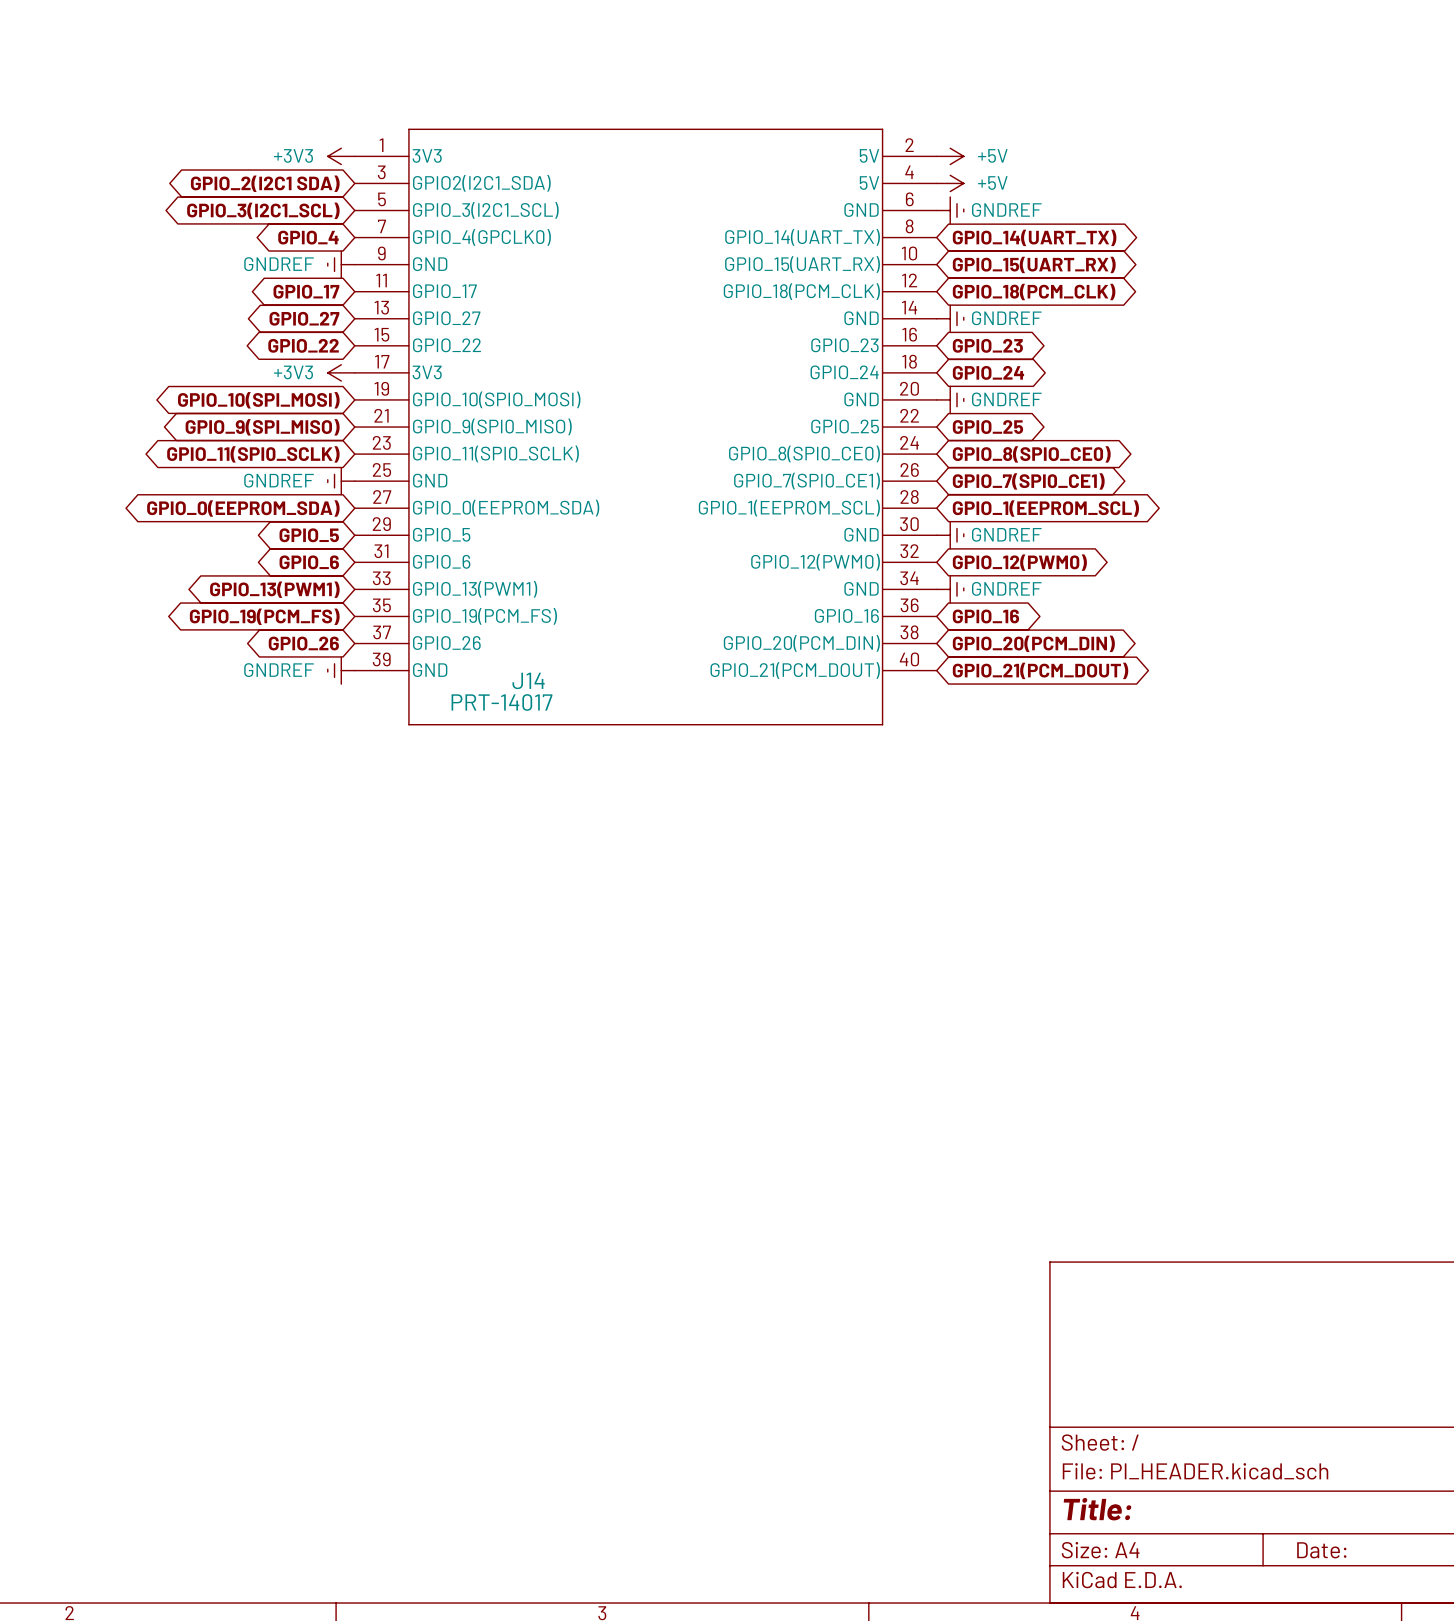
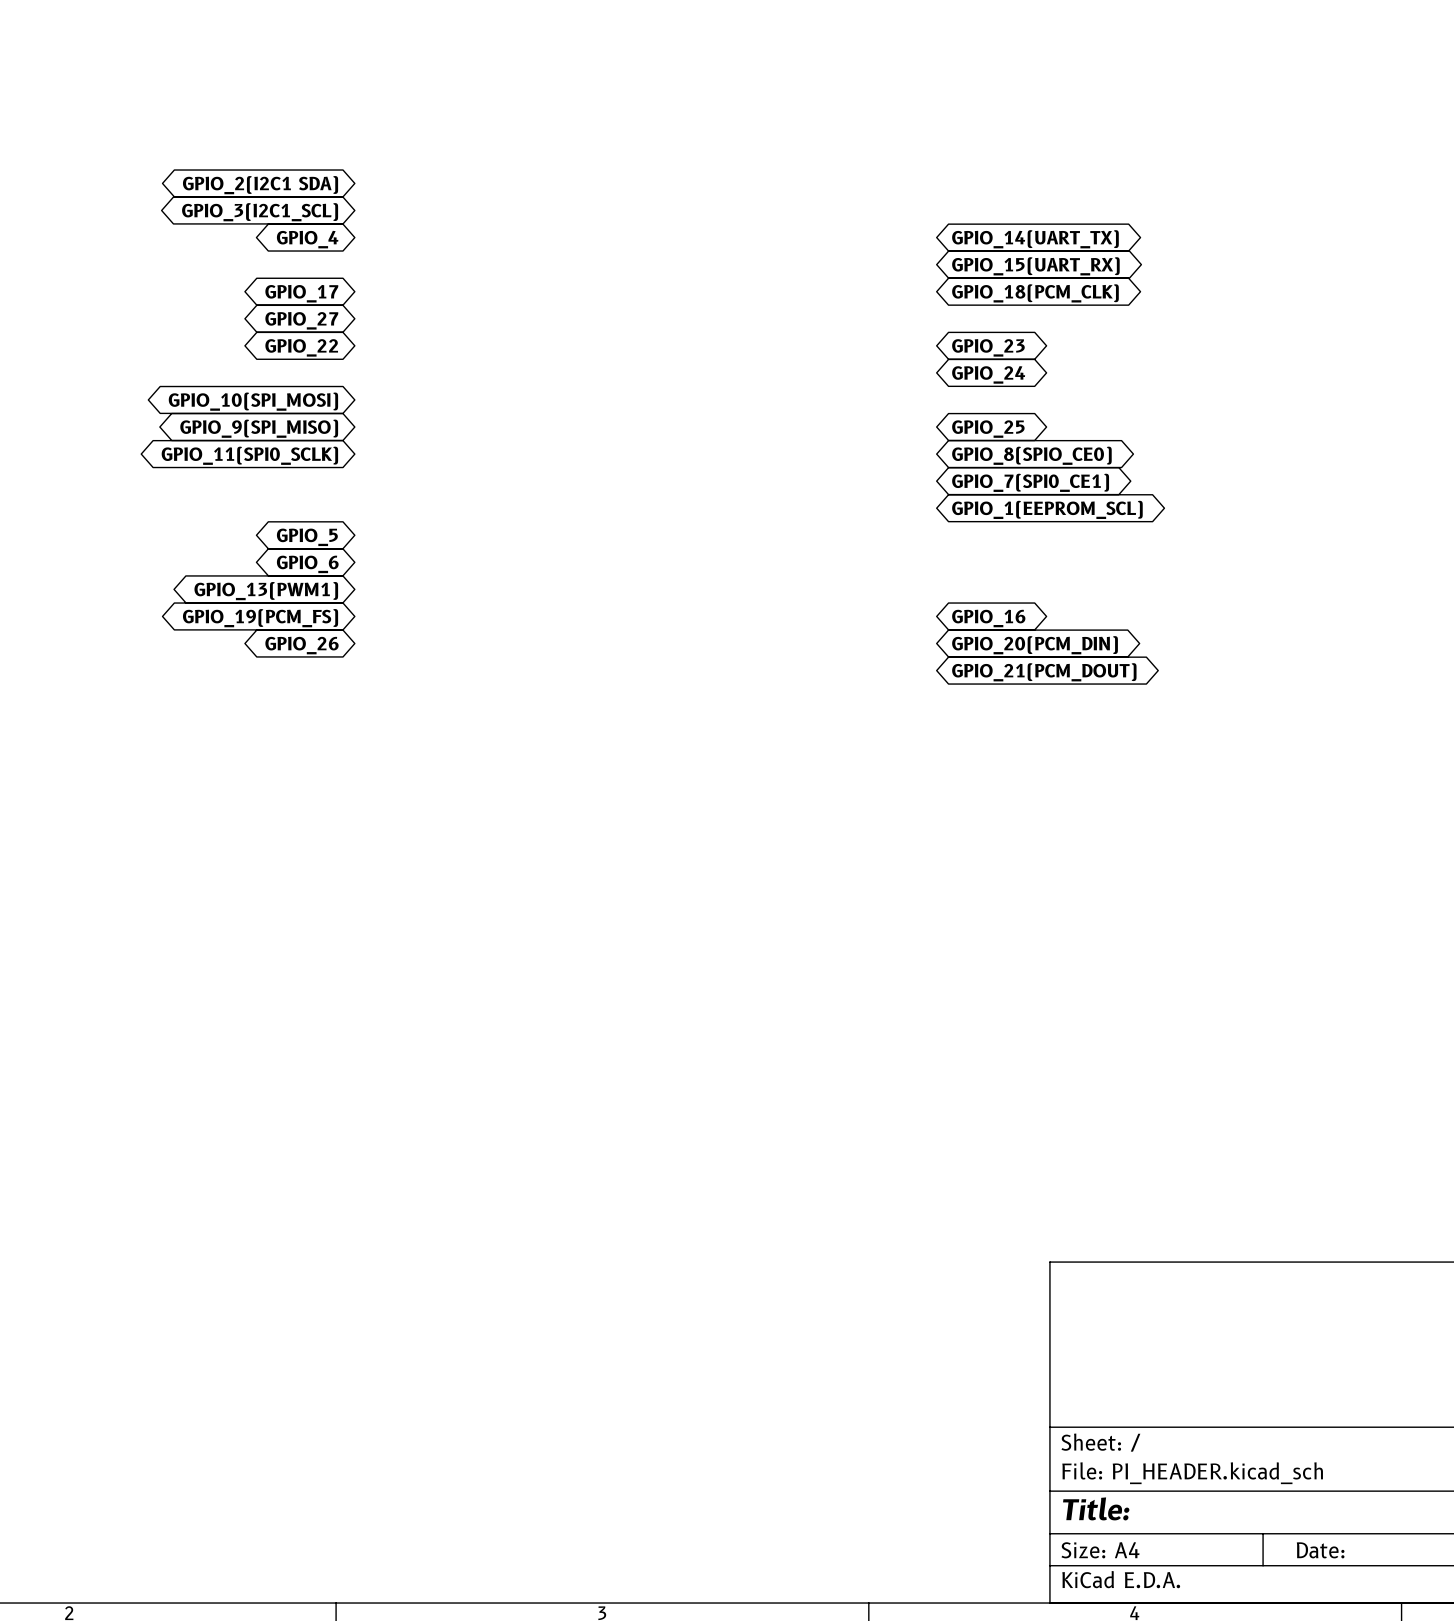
power symbol: +3V3 (341, 156) -> none
power symbol: +5V (950, 156) -> none
power symbol: +5V (950, 183) -> none
power symbol: GNDREF (950, 210) -> none
power symbol: GNDREF (341, 264) -> none
power symbol: GNDREF (950, 318) -> none
power symbol: +3V3 (341, 372) -> none
power symbol: GNDREF (950, 399) -> none
J14: PRT-14017 (645, 427) -> none
power symbol: GNDREF (341, 481) -> none
global label: GPIO_0(EEPROM_SDA) (243, 508) -> none
power symbol: GNDREF (950, 535) -> none
global label: GPIO_12(PWM0) (1019, 562) -> none
power symbol: GNDREF (950, 589) -> none
power symbol: GNDREF (341, 670) -> none

